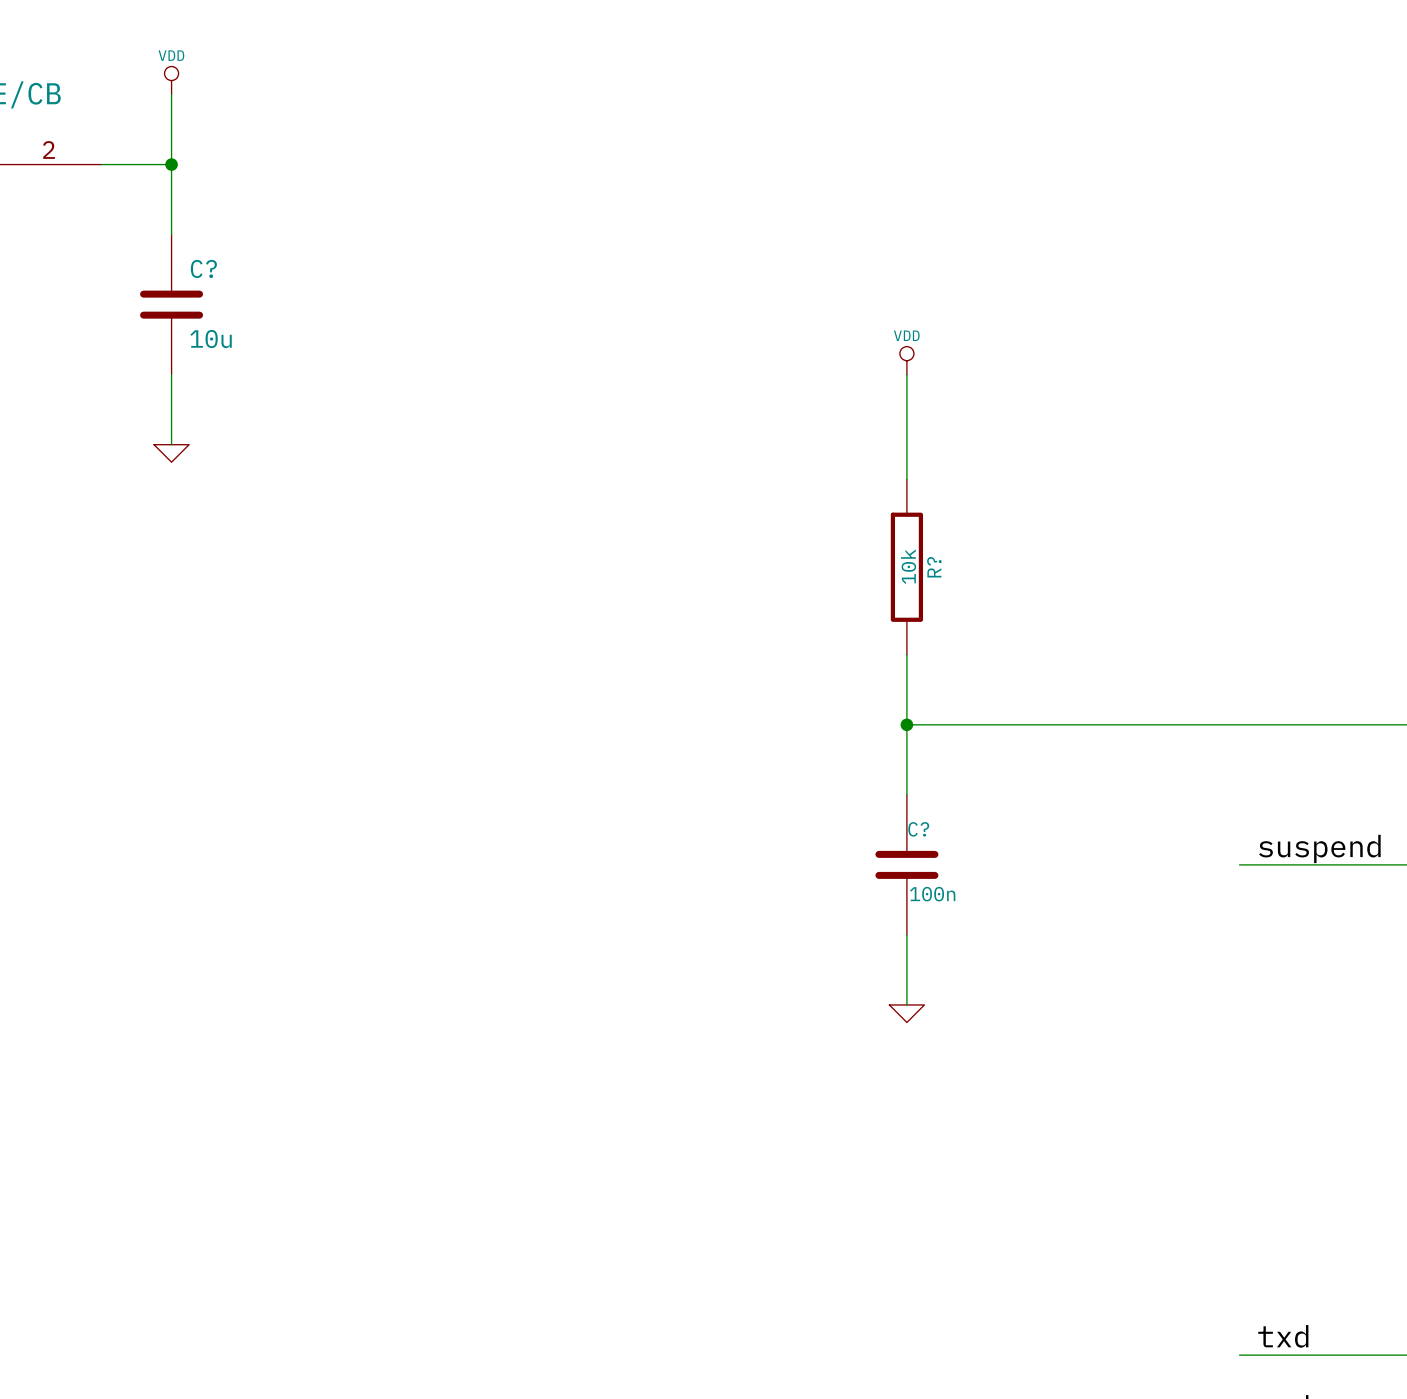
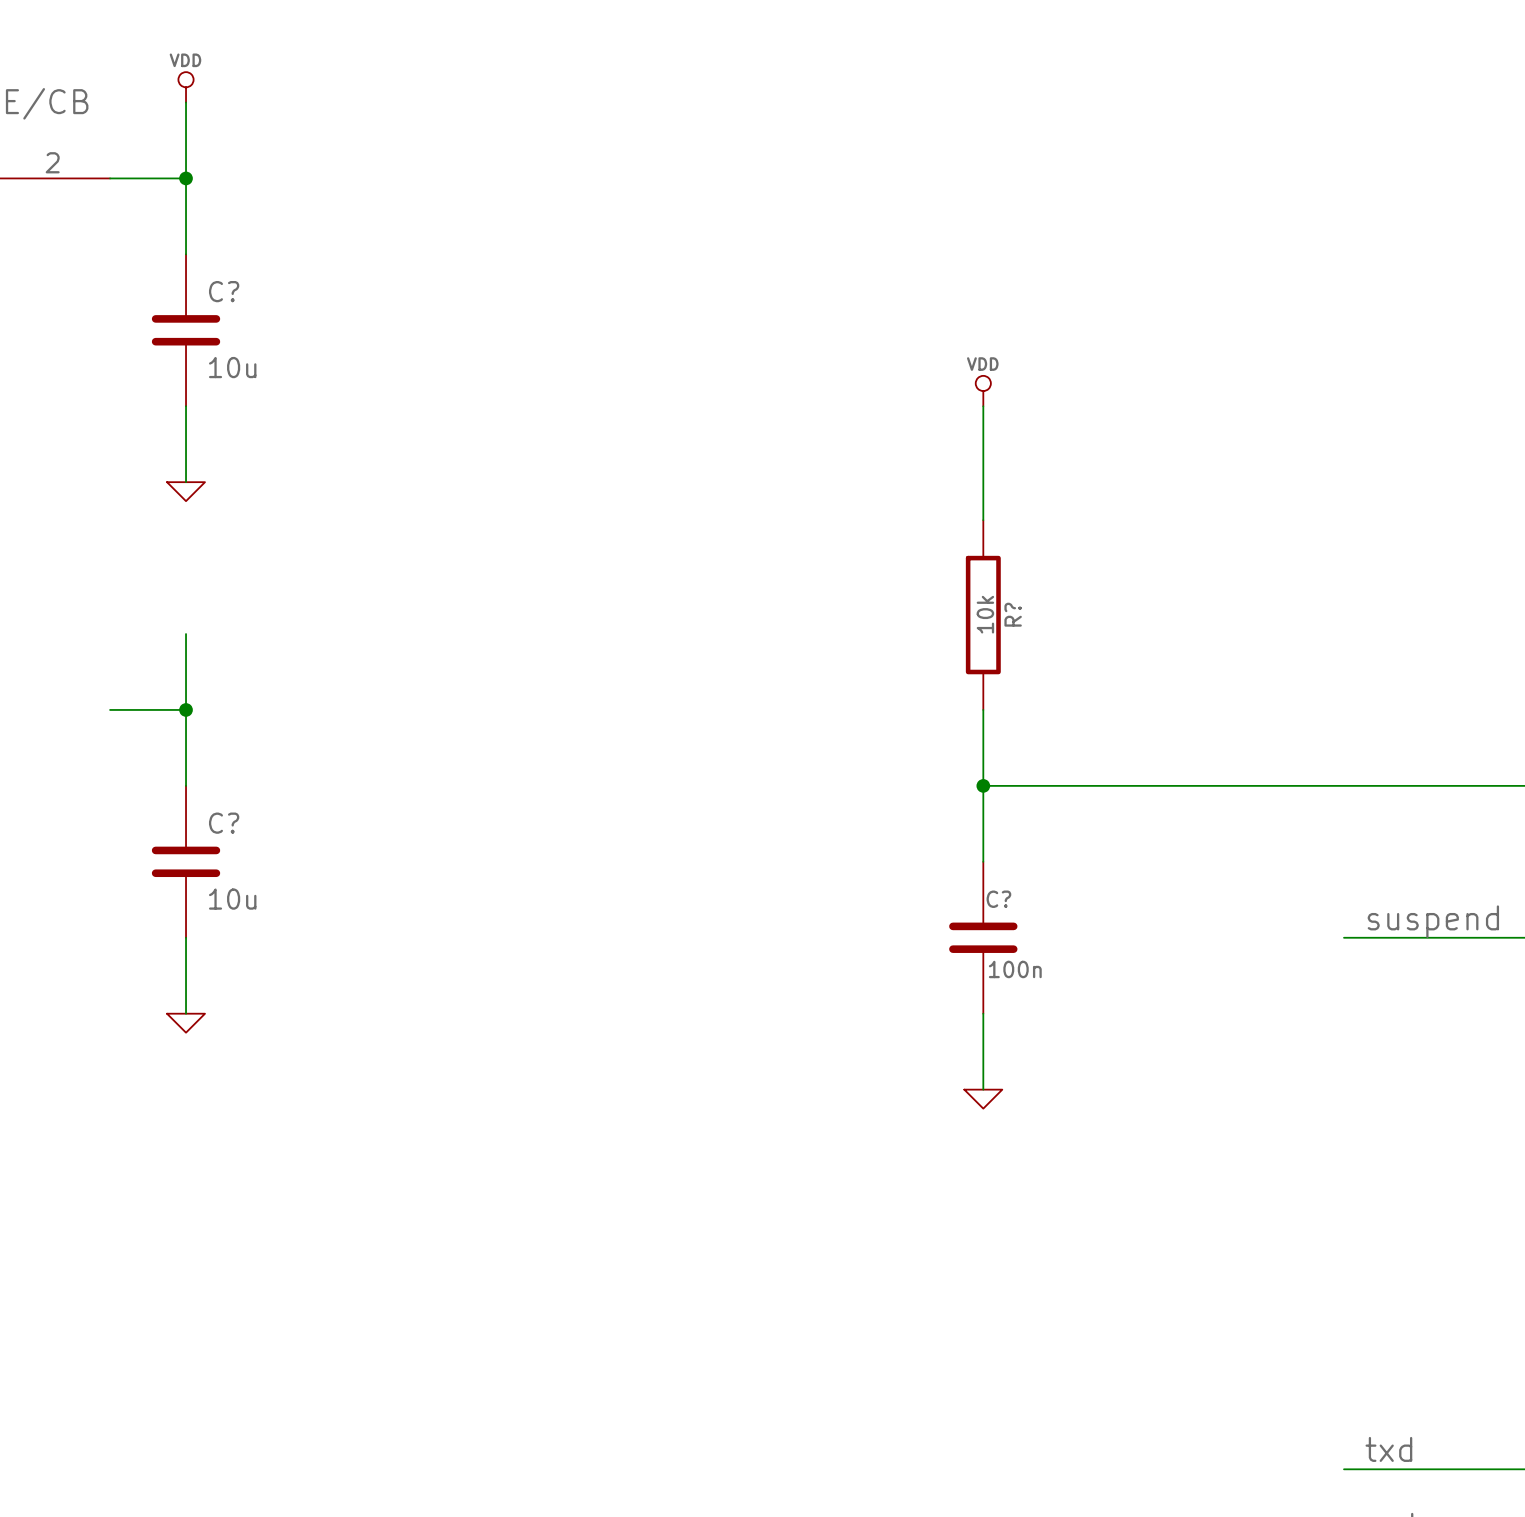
wire: none -> (186, 634) (186, 785)
wire: none -> (110, 709) (186, 709)
junction: none -> (186, 709)
C?: none -> 10u (186, 861)
wire: none -> (186, 937) (186, 1013)
power symbol: none -> (186, 1023)

